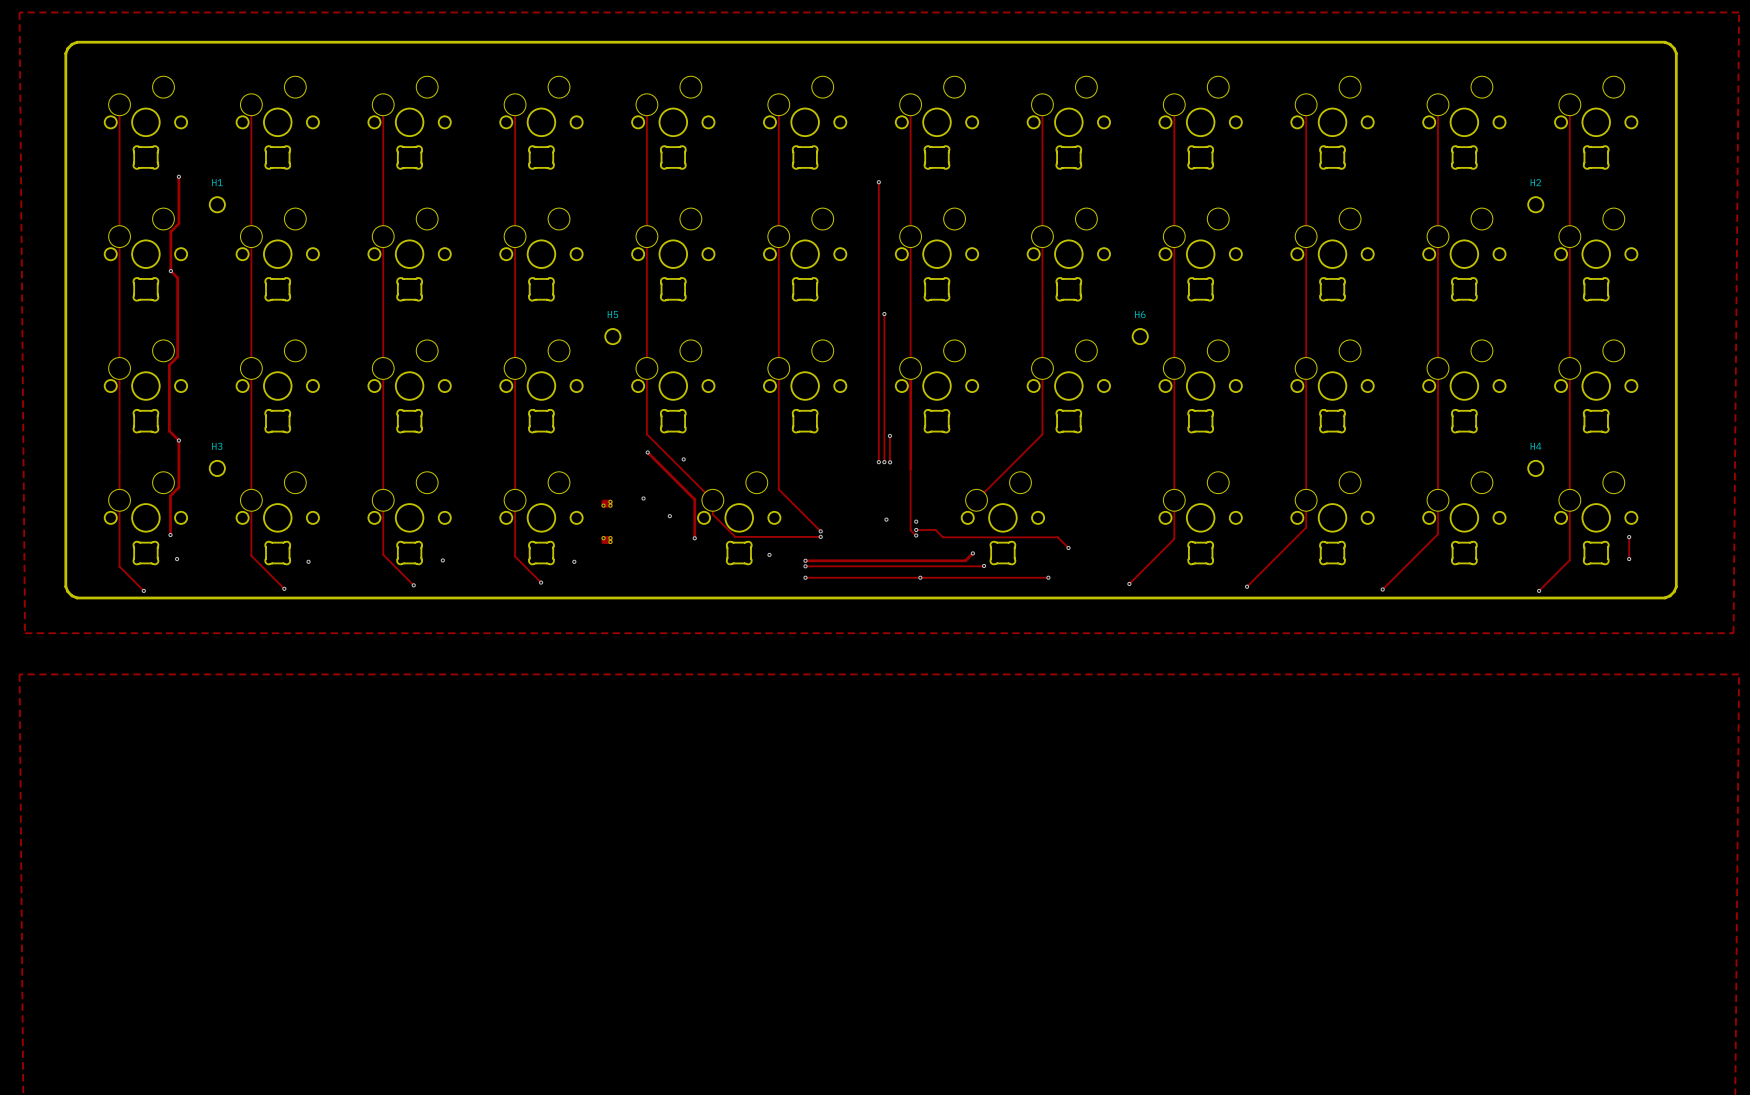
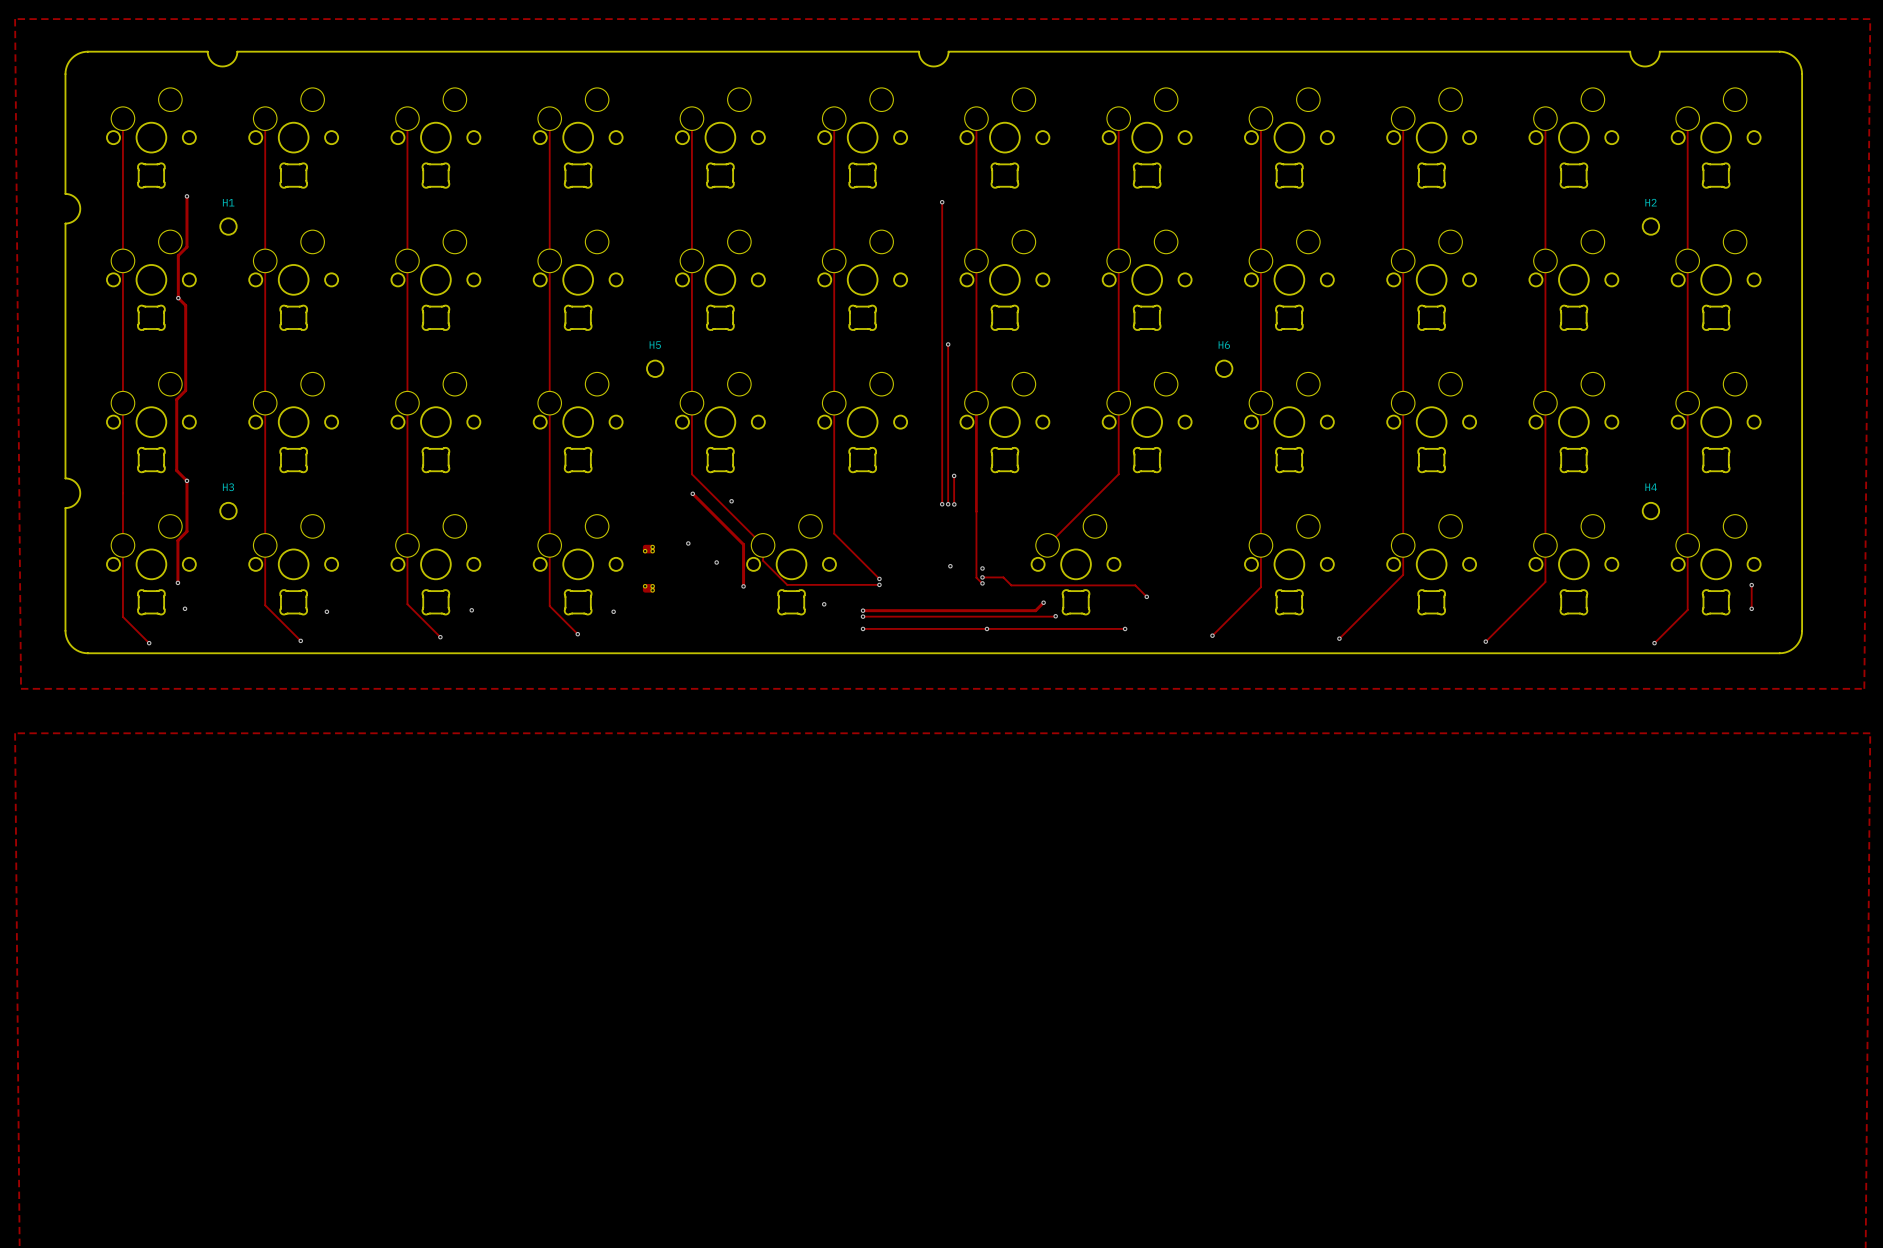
board edge: (77, 42) (72, 44) (65, 53) (65, 586) (67, 591) (77, 597) (1665, 597) (1670, 595) (1676, 586) (1676, 53) (1670, 44) (1665, 42) (77, 42) -> (87, 51) (80, 52) (72, 58) (67, 64) (65, 74) (65, 193) (75, 198) (80, 208) (75, 219) (65, 223) (65, 478) (76, 483) (80, 493) (76, 503) (65, 508) (65, 630) (68, 642) (79, 651) (87, 653) (1779, 653) (1790, 650) (1800, 639) (1802, 630) (1802, 74) (1797, 60) (1787, 52) (1659, 51) (1656, 61) (1645, 66) (1633, 61) (1630, 51) (948, 51) (944, 62) (933, 66) (923, 62) (918, 51) (237, 51) (233, 62) (222, 66) (212, 62) (207, 51) (87, 51)

